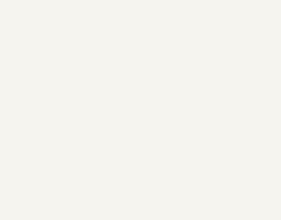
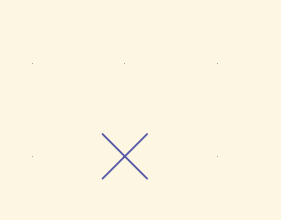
no-connect mark: none -> (124, 156)

